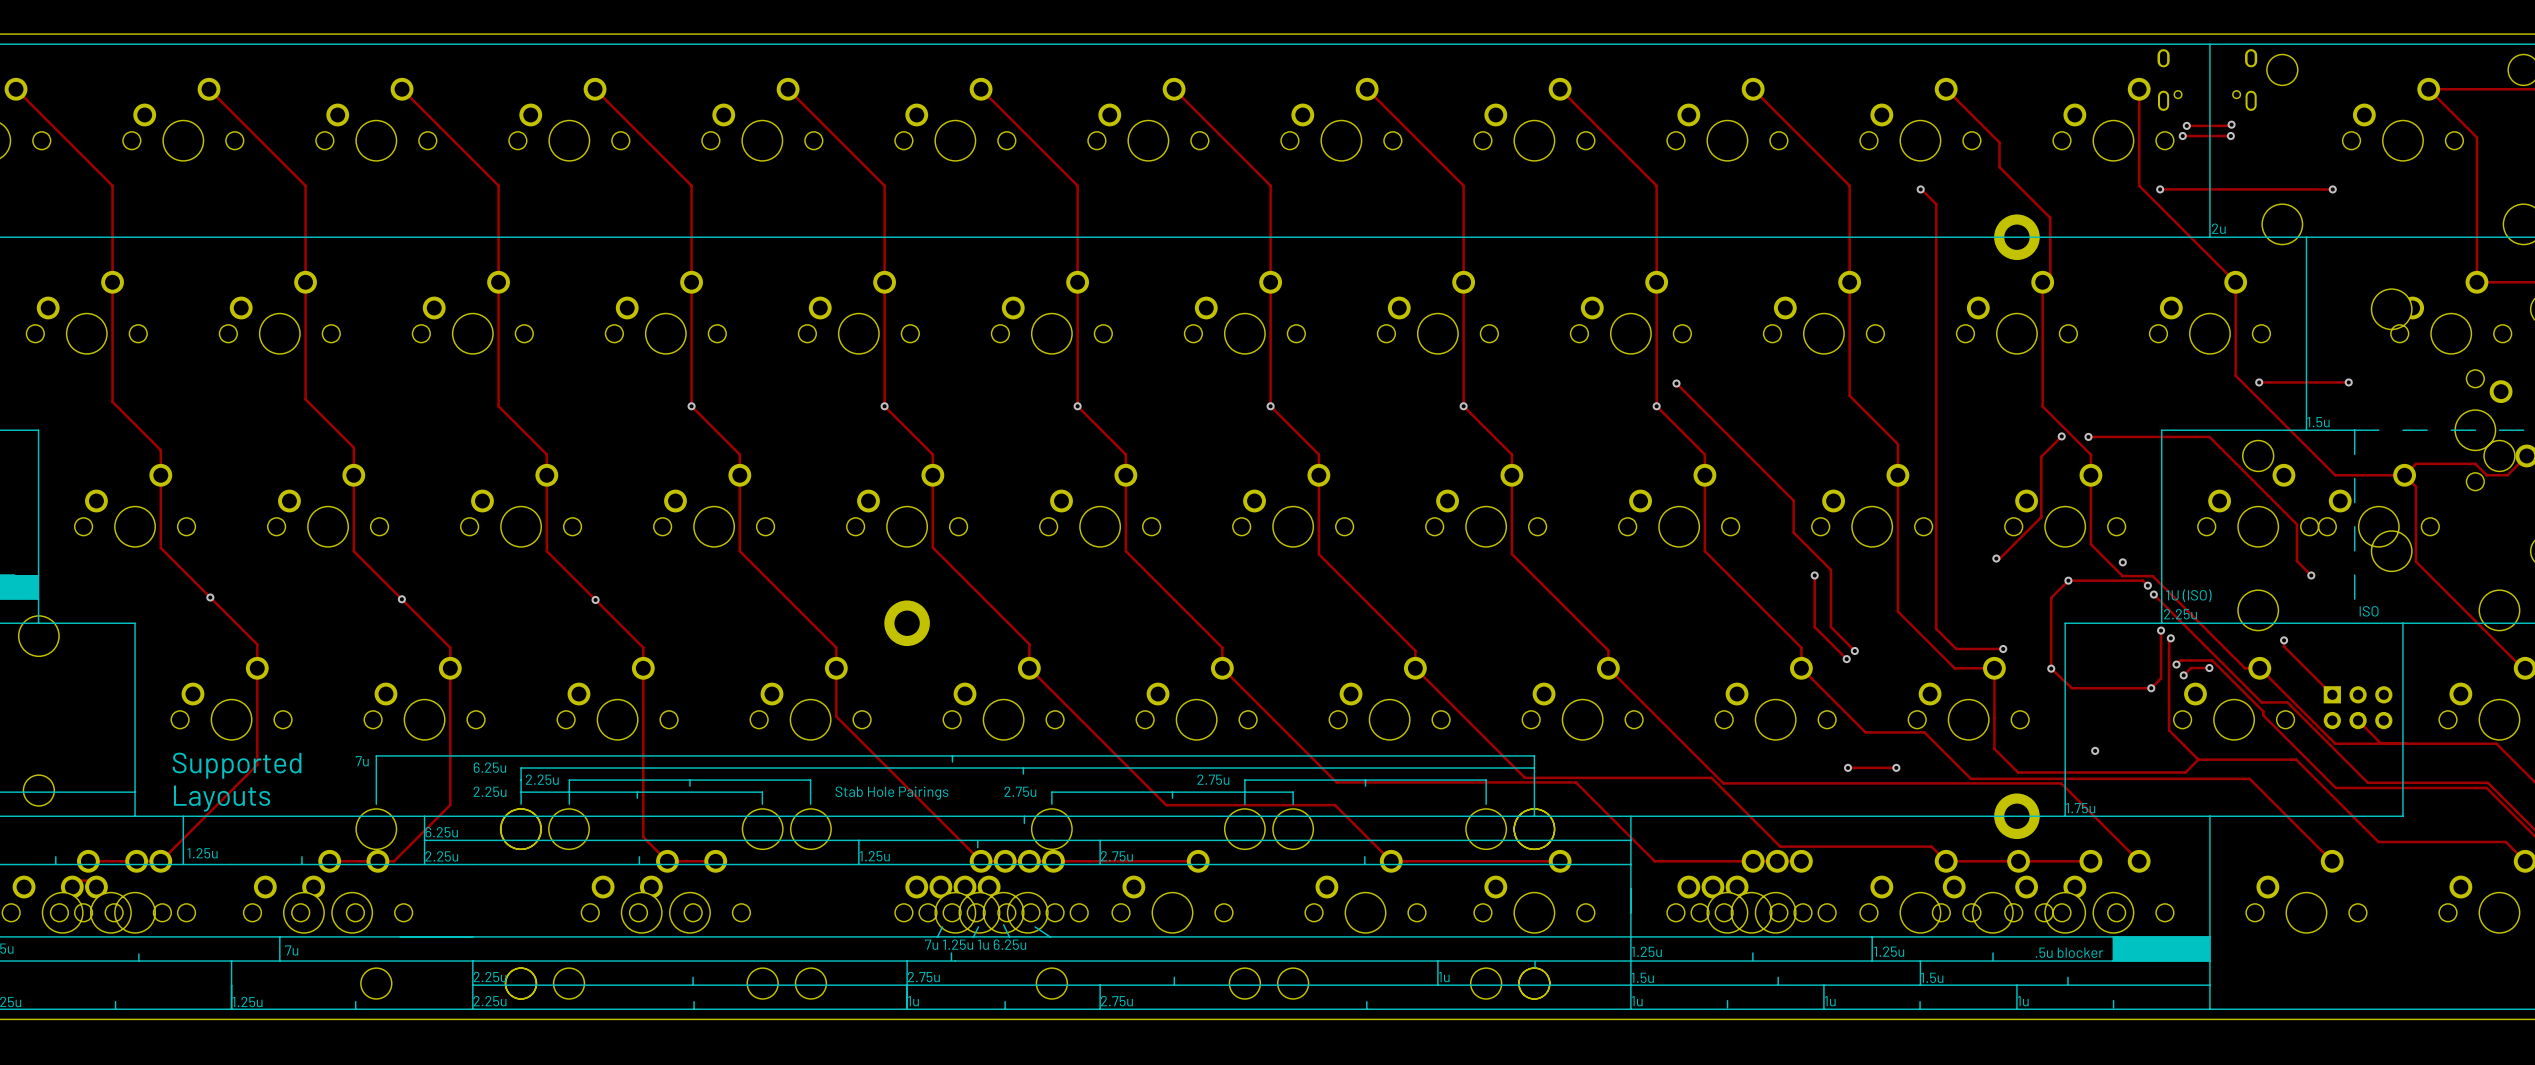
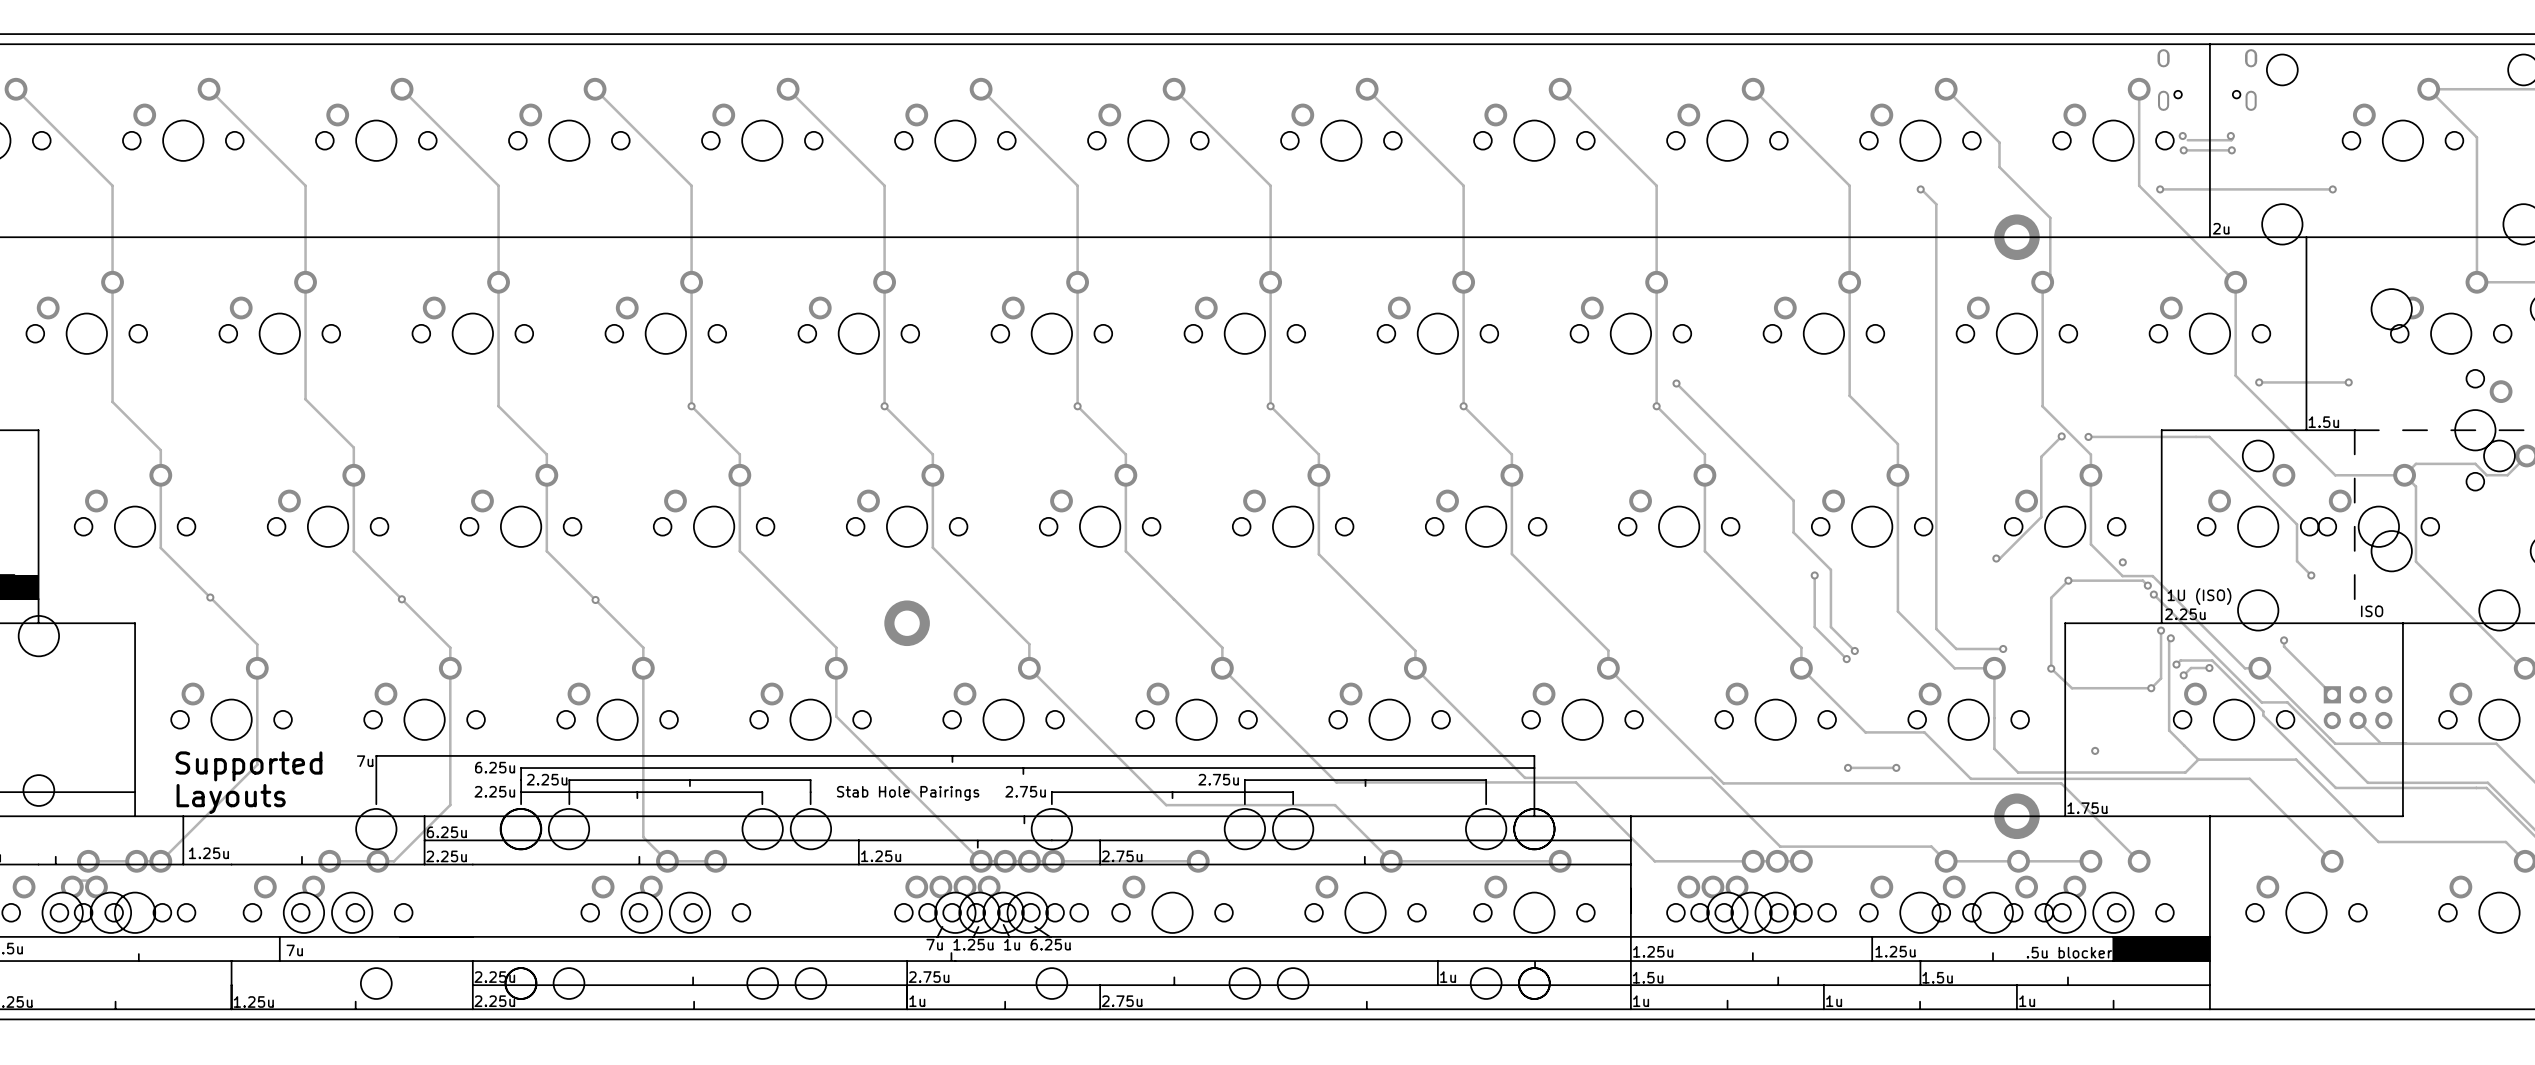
track: (2231, 124) (2186, 125) -> (2232, 139) (2187, 140)
via: (2231, 124) -> none
via position: (2186, 125) -> (2183, 150)
track: (2182, 136) (2230, 136) -> (2183, 150) (2231, 150)
via: none -> (2231, 150)

